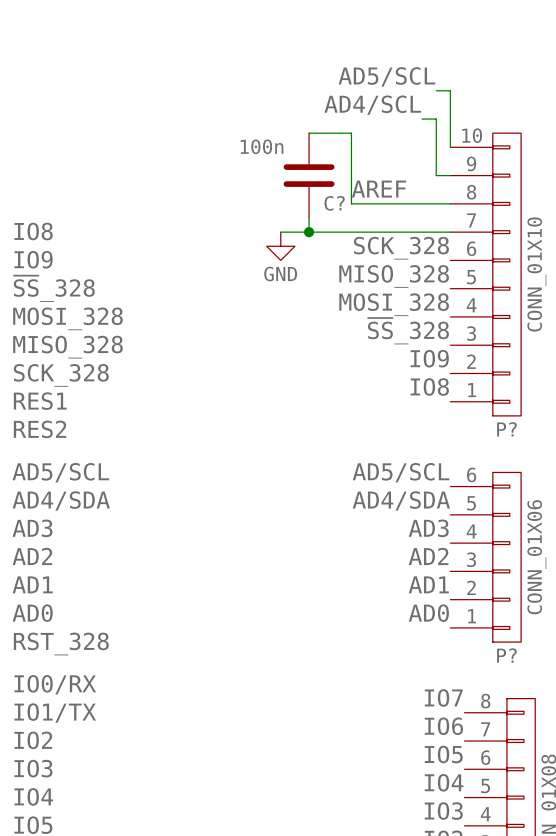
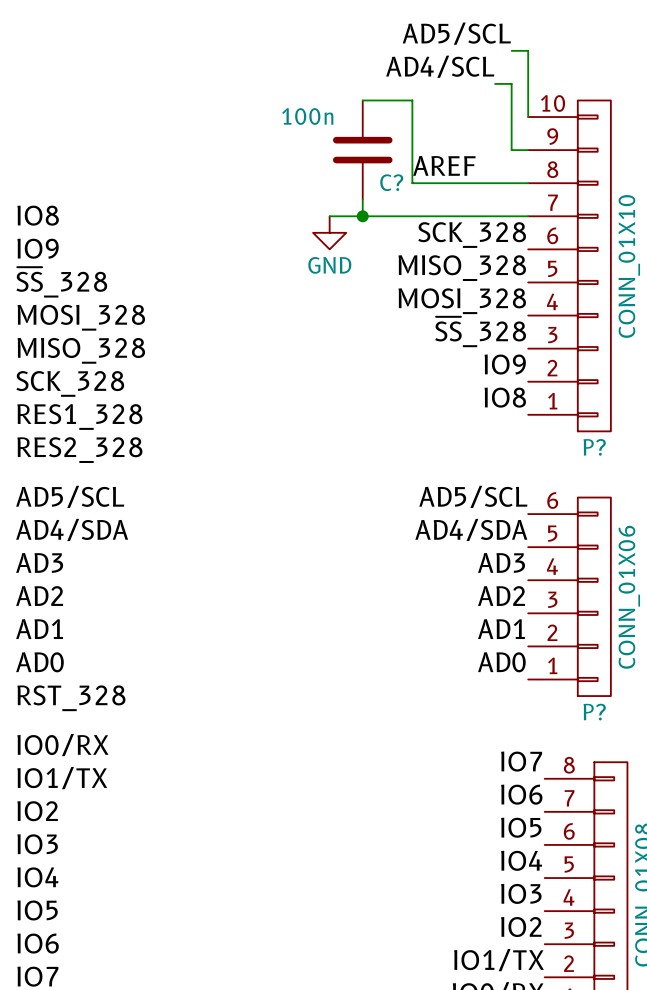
label: RES1 (40, 401) -> RES1_328 (79, 417)
label: RES2 (40, 429) -> RES2_328 (79, 450)

